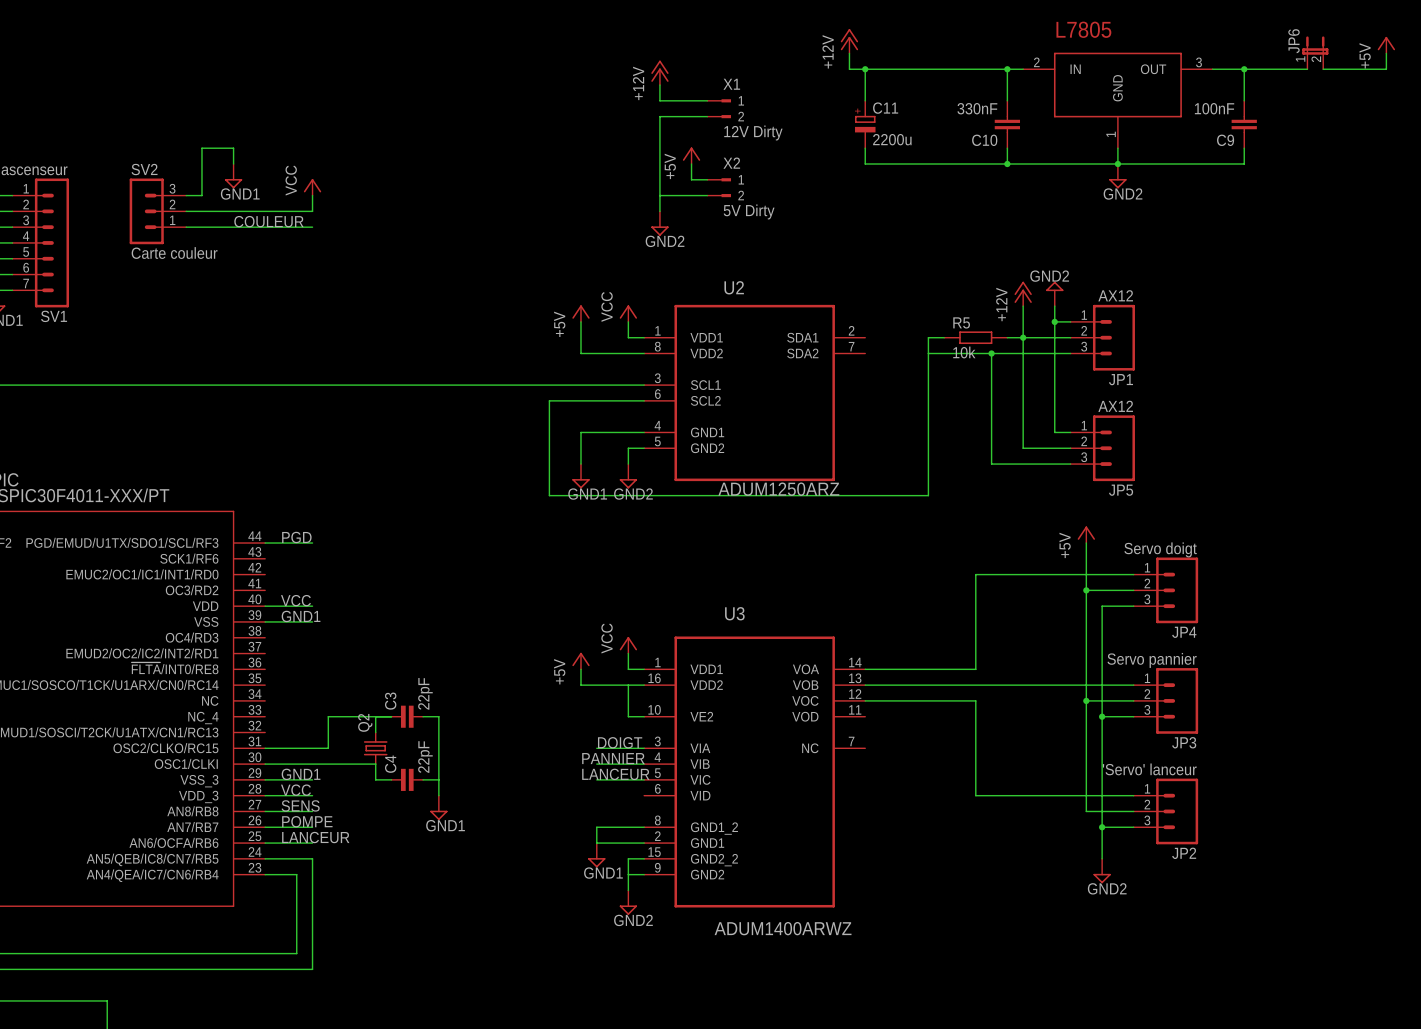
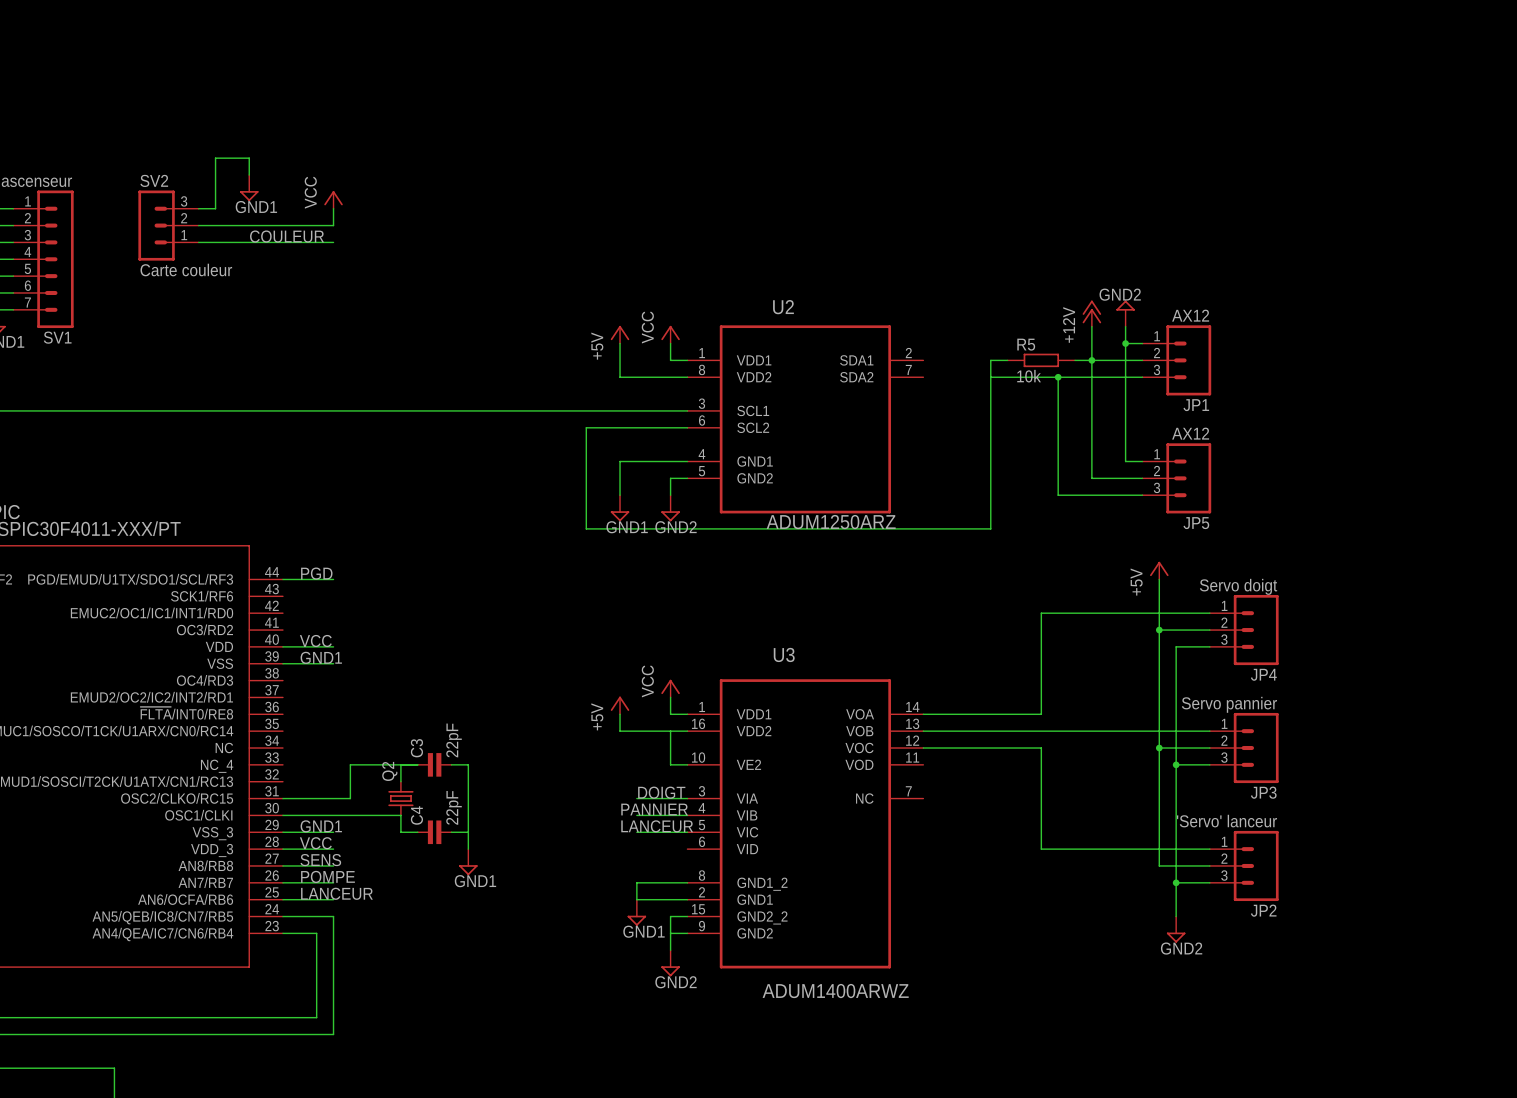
power symbol: +12V (849, 41) -> none
power symbol: +5V (1386, 45) -> none
JP6: (1315, 52) -> none
wire: (849, 53) (849, 69) (1023, 69) -> none
wire: (1386, 53) (1386, 69) (1323, 69) -> none
wire: (865, 69) (865, 100) -> none
junction: (865, 69) -> none
wire: (1007, 69) (1007, 100) -> none
junction: (1007, 69) -> none
wire: (1212, 69) (1307, 69) -> none
wire: (1244, 69) (1244, 100) -> none
junction: (1244, 69) -> none
power symbol: +12V (659, 72) -> none
wire: (659, 85) (659, 100) (707, 100) -> none
part: (1117, 100) -> none
X1: 12V Dirty (719, 108) -> none
wire: (707, 116) (659, 116) (659, 211) -> none
C11: 2200u (865, 124) -> none
C10: 330nF (1007, 124) -> none
C9: 100nF (1244, 124) -> none
wire: (865, 148) (865, 164) (1244, 164) (1244, 148) -> none
wire: (1007, 148) (1007, 164) -> none
wire: (1117, 148) (1117, 164) -> none
power symbol: +5V (691, 155) -> none
wire: (691, 164) (691, 179) (707, 179) -> none
junction: (1007, 164) -> none
junction: (1117, 164) -> none
power symbol: GND2 (1117, 176) -> none
X2: 5V Dirty (719, 187) -> none
wire: (659, 195) (707, 195) -> none
power symbol: GND2 (659, 223) -> none

